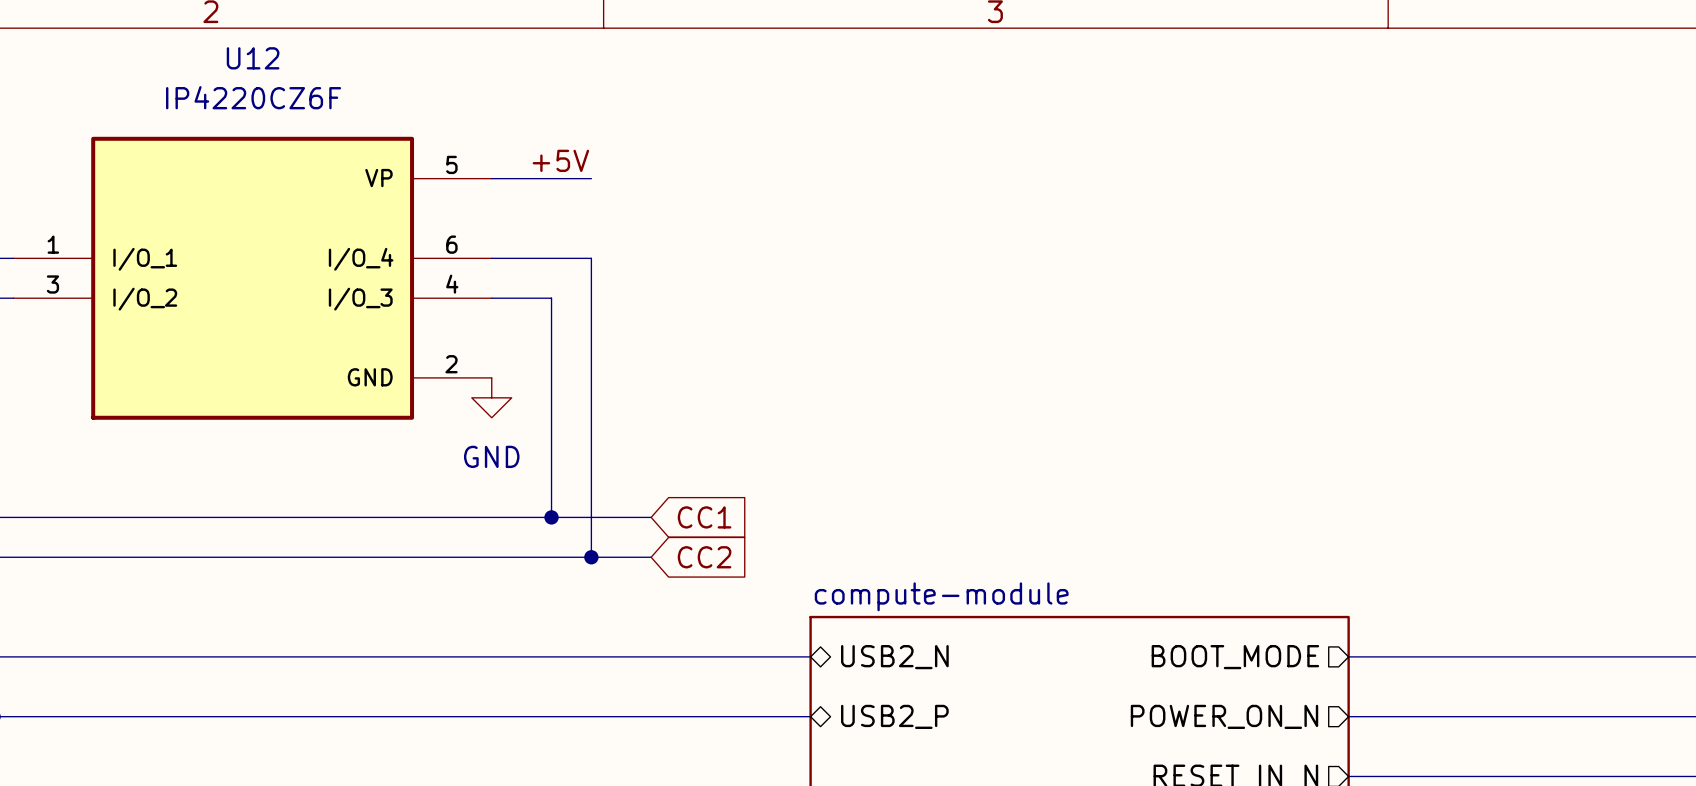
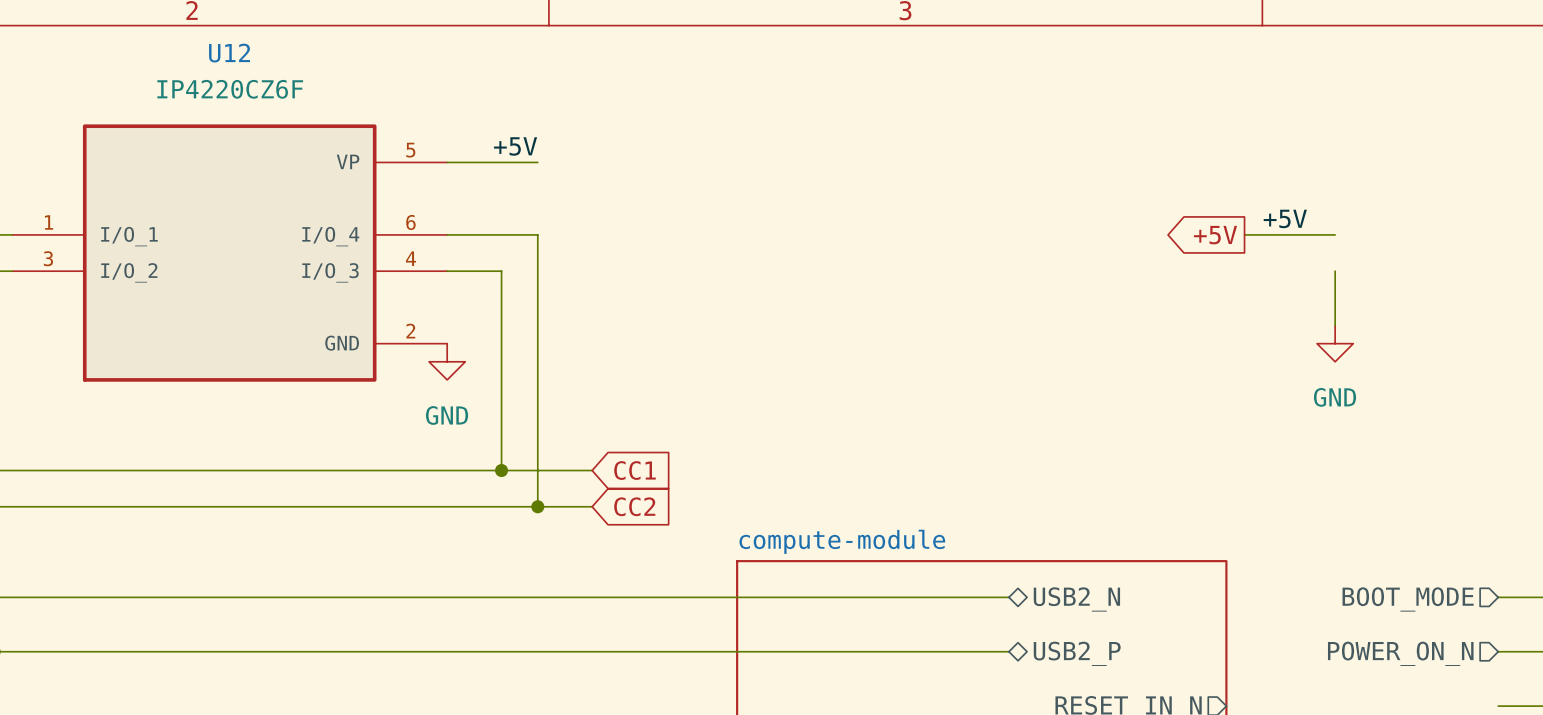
label: none -> +5V (1285, 218)
global label: none -> +5V (1215, 235)
wire: none -> (1244, 234) (1335, 234)
wire: none -> (1335, 271) (1335, 325)
power symbol: none -> GND (1335, 343)
wire: none -> (737, 597) (1008, 597)
wire: (1348, 656) (1647, 656) -> none
sheet pin position: USB2_N (894, 657) -> USB2_N (1076, 599)
sheet pin position: BOOT_MODE (1235, 657) -> BOOT_MODE (1408, 599)
wire: none -> (737, 651) (1008, 651)
sheet pin position: USB2_P (894, 716) -> USB2_P (1077, 653)
sheet pin position: POWER_ON_N (1224, 716) -> POWER_ON_N (1400, 653)
wire: (1348, 716) (1647, 716) -> none
wire: (1348, 776) (1647, 776) -> none

